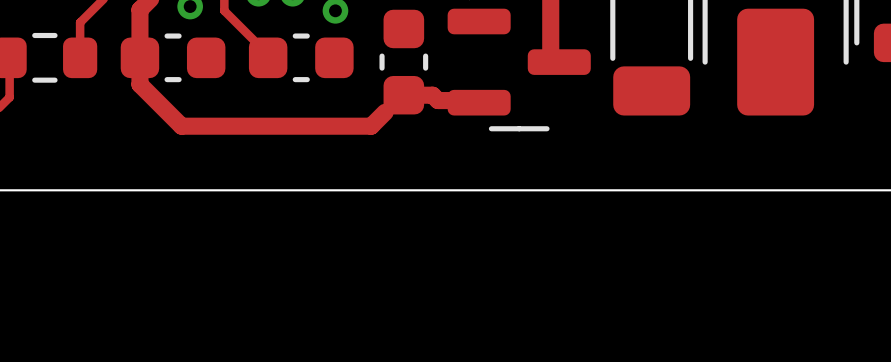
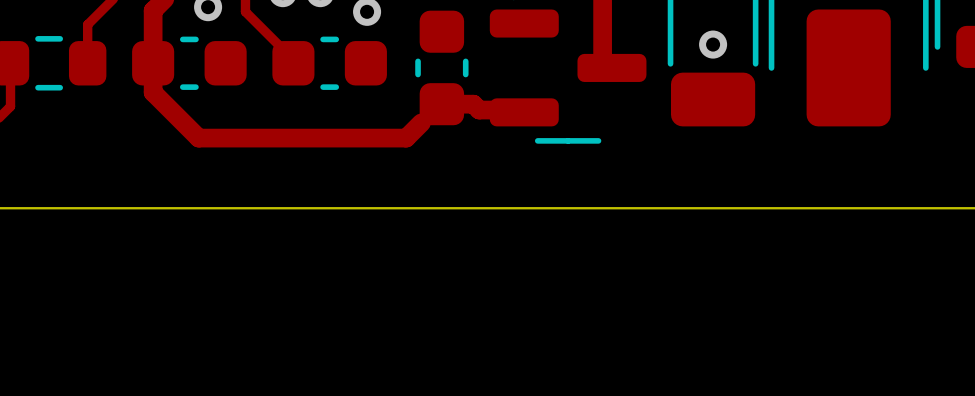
via: none -> (713, 44)

